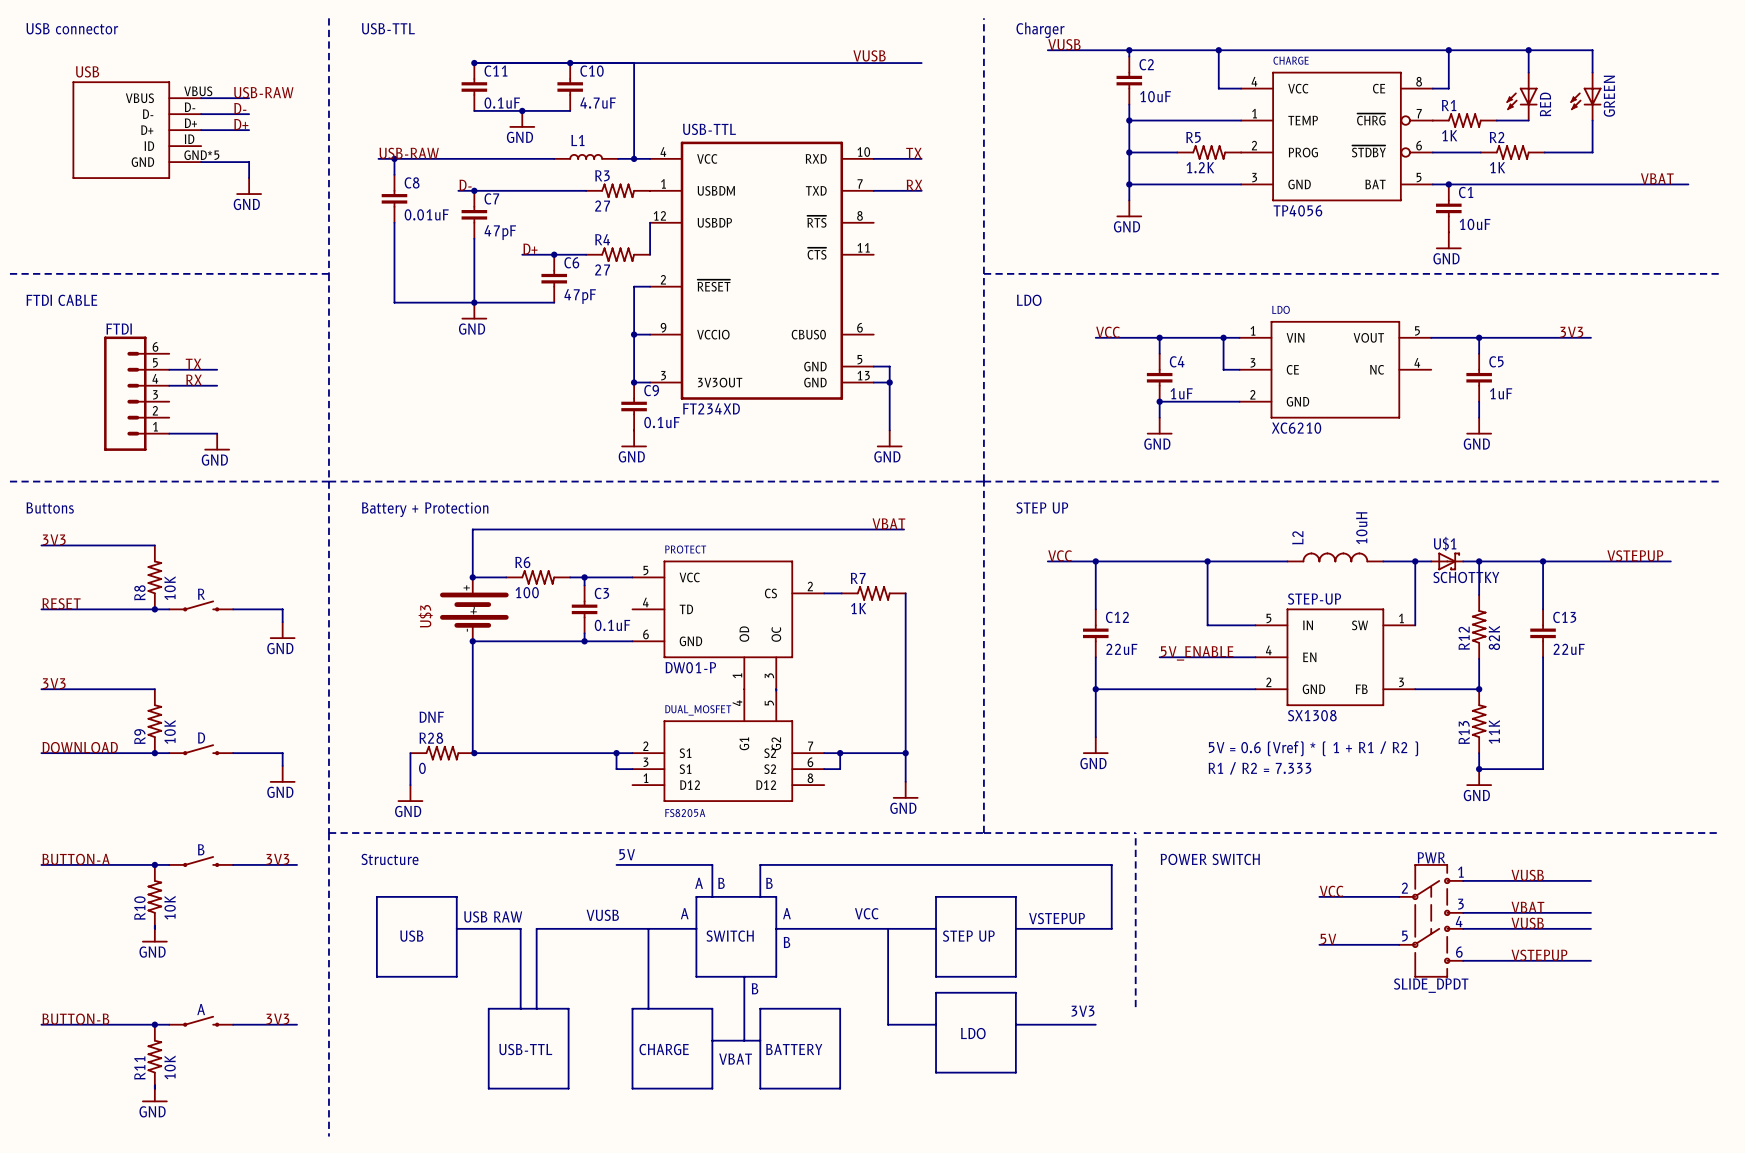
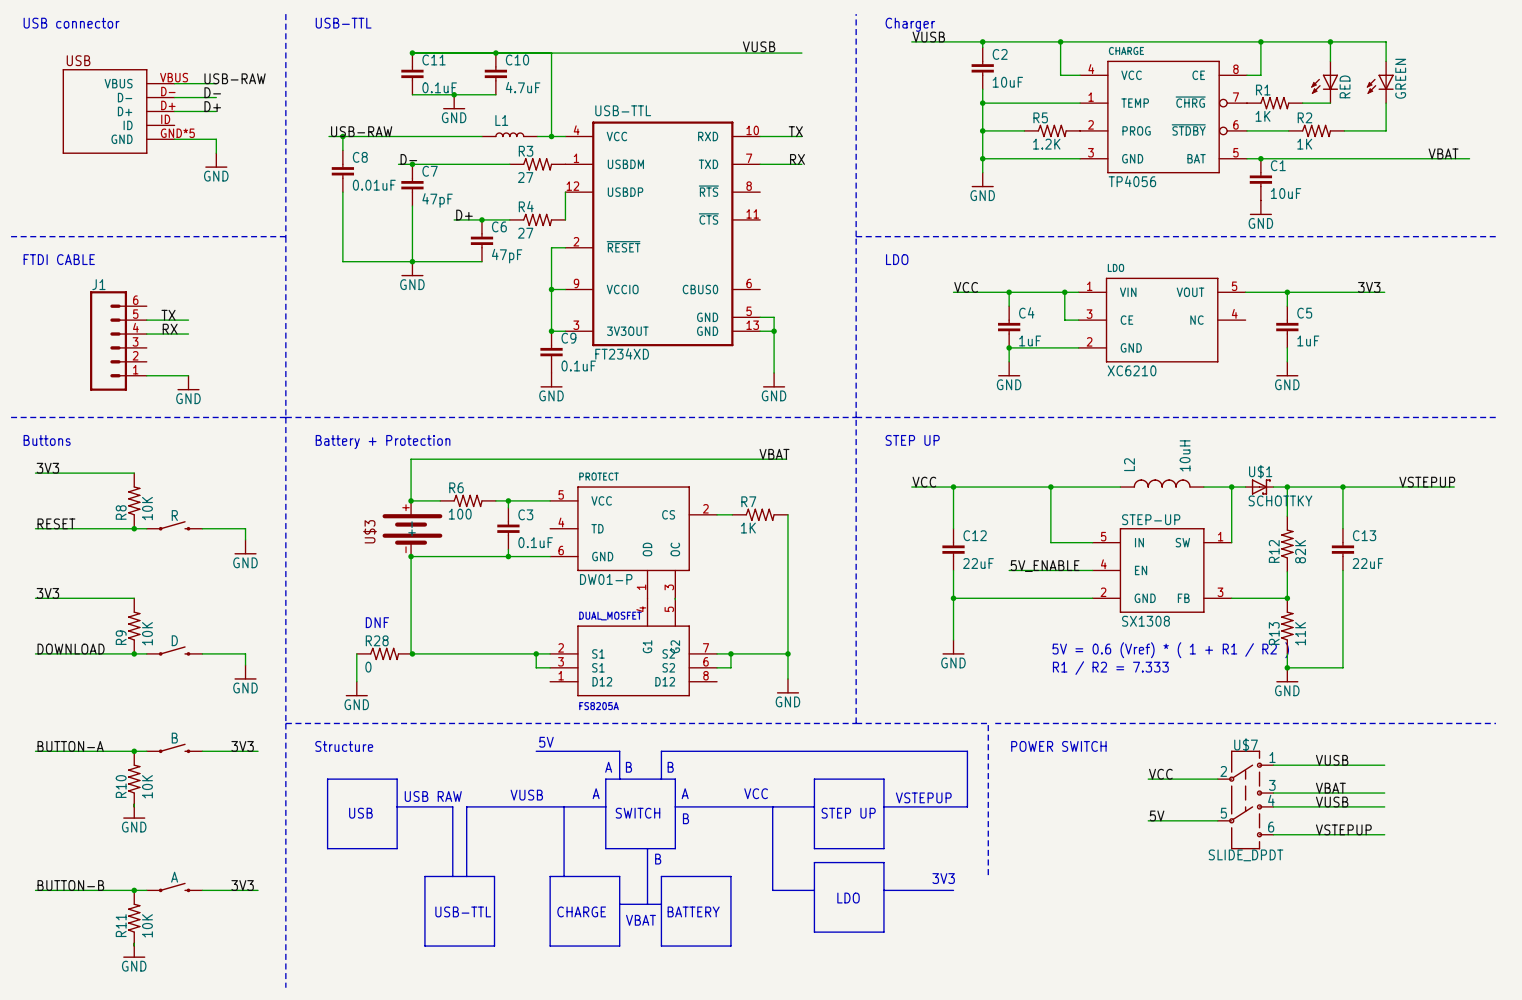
FTDI name: FTDI (119, 329) -> J1 (98, 284)
PWR name: PWR (1431, 857) -> U$7 (1246, 745)

